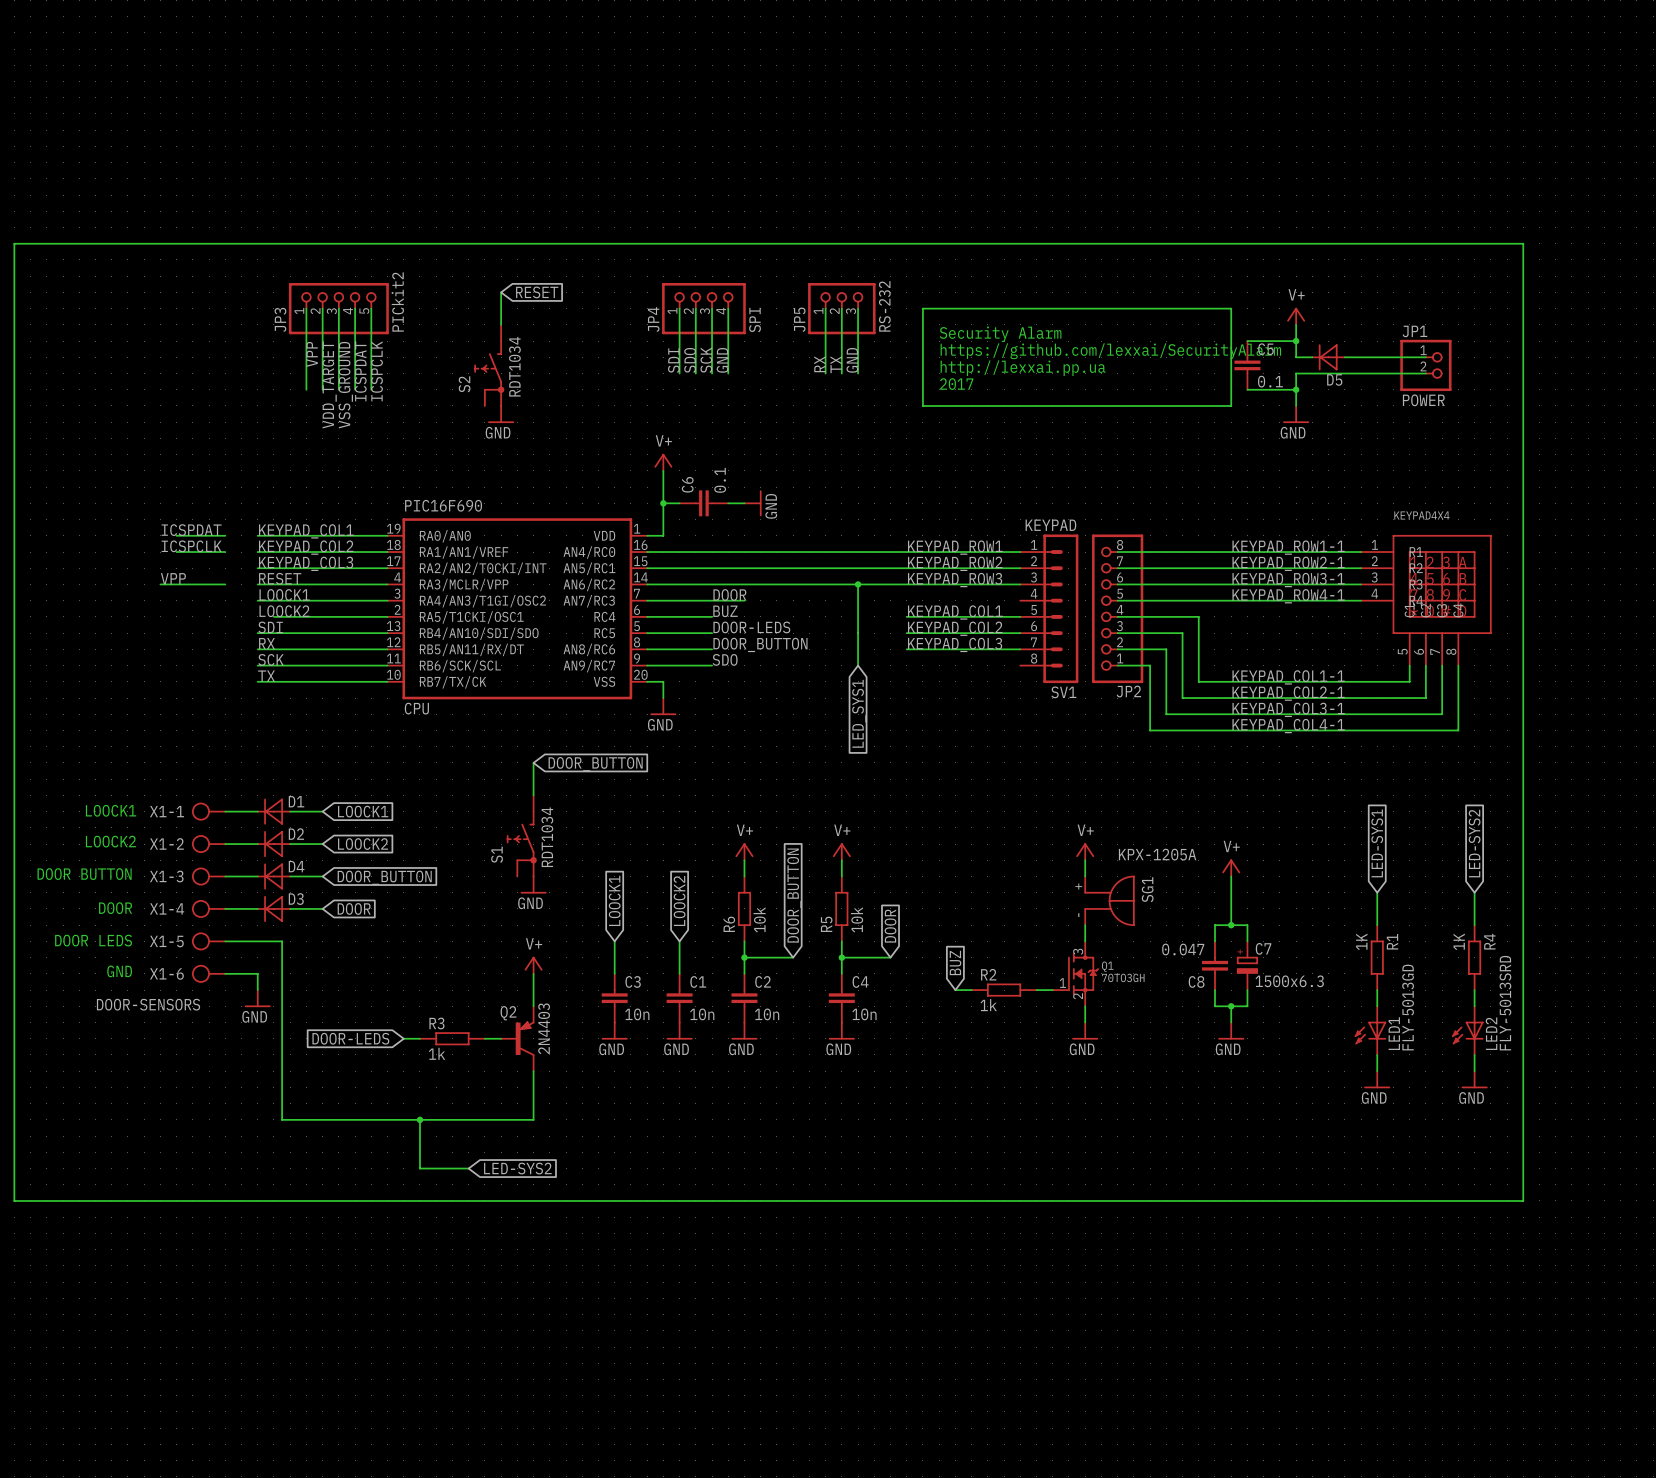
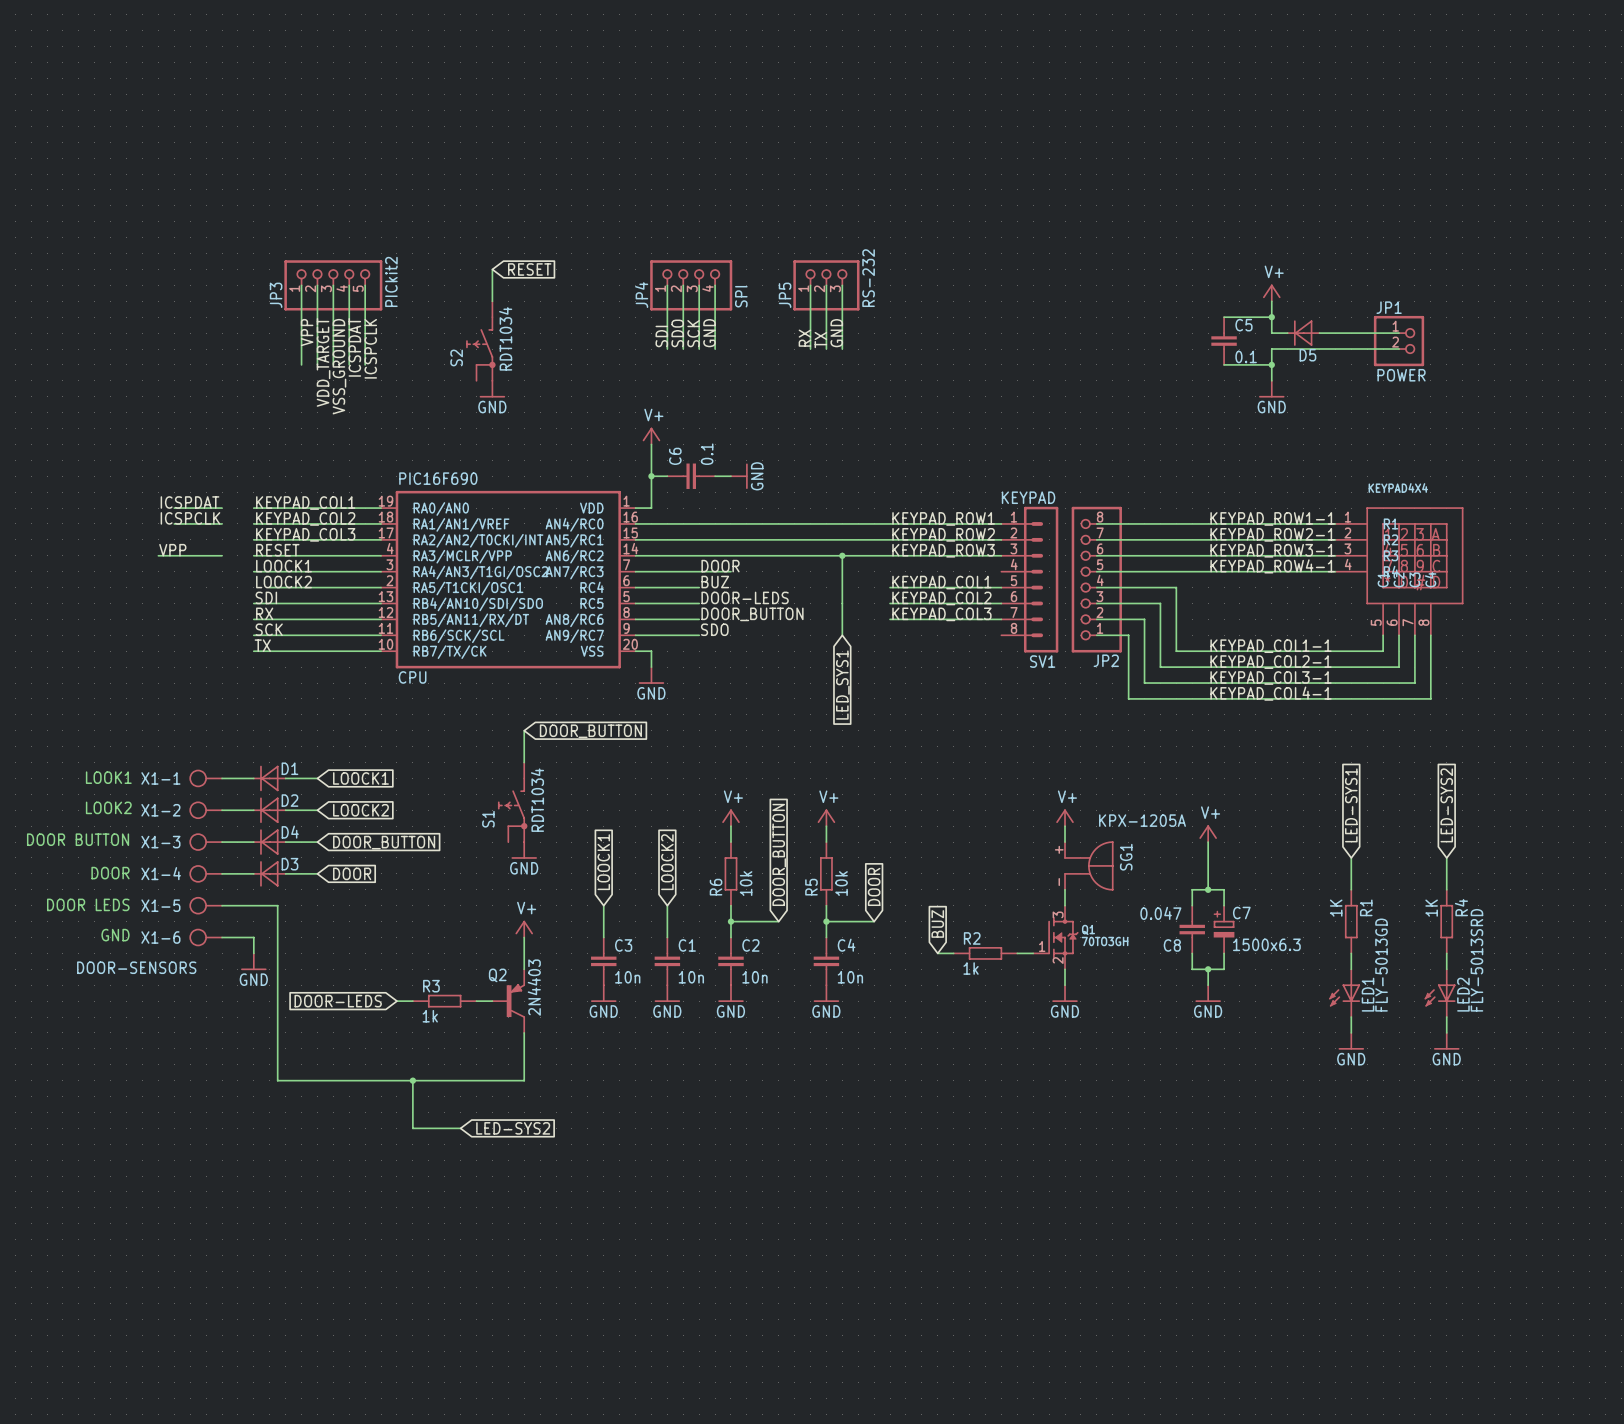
wire: (14, 243) (14, 1200) (1523, 1200) (1523, 243) (14, 243) -> none
wire: (922, 308) (922, 405) (1231, 405) (1231, 308) (922, 308) -> none
text: Security Alarm (1000, 334) -> none
text: https://github.com/lexxai/SecurityAlarm (1110, 351) -> none
text: http://lexxai.pp.ua (1023, 368) -> none
text: 2017 (956, 384) -> none
text: LOOCK1 (111, 810) -> LOOK1 (108, 777)
text: LOOCK2 (110, 841) -> LOOK2 (108, 807)

